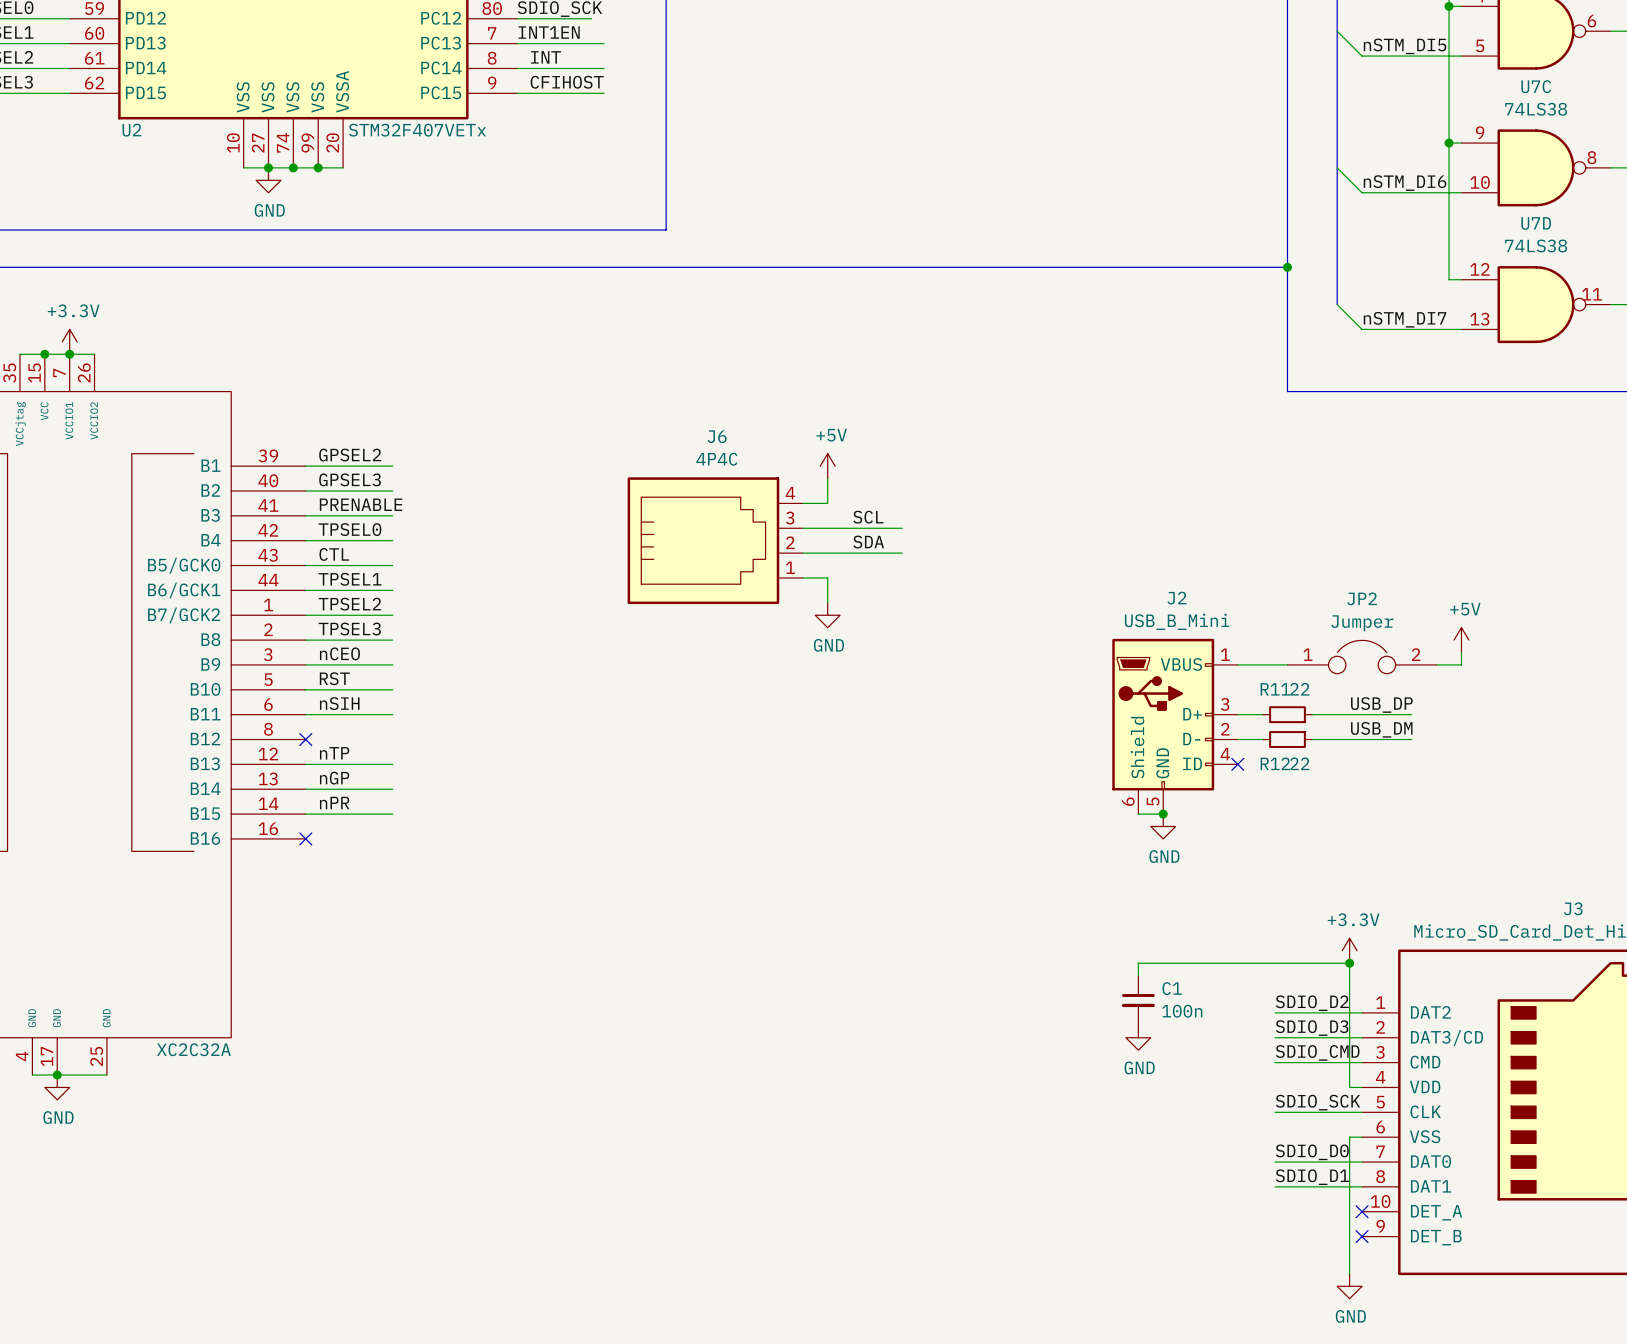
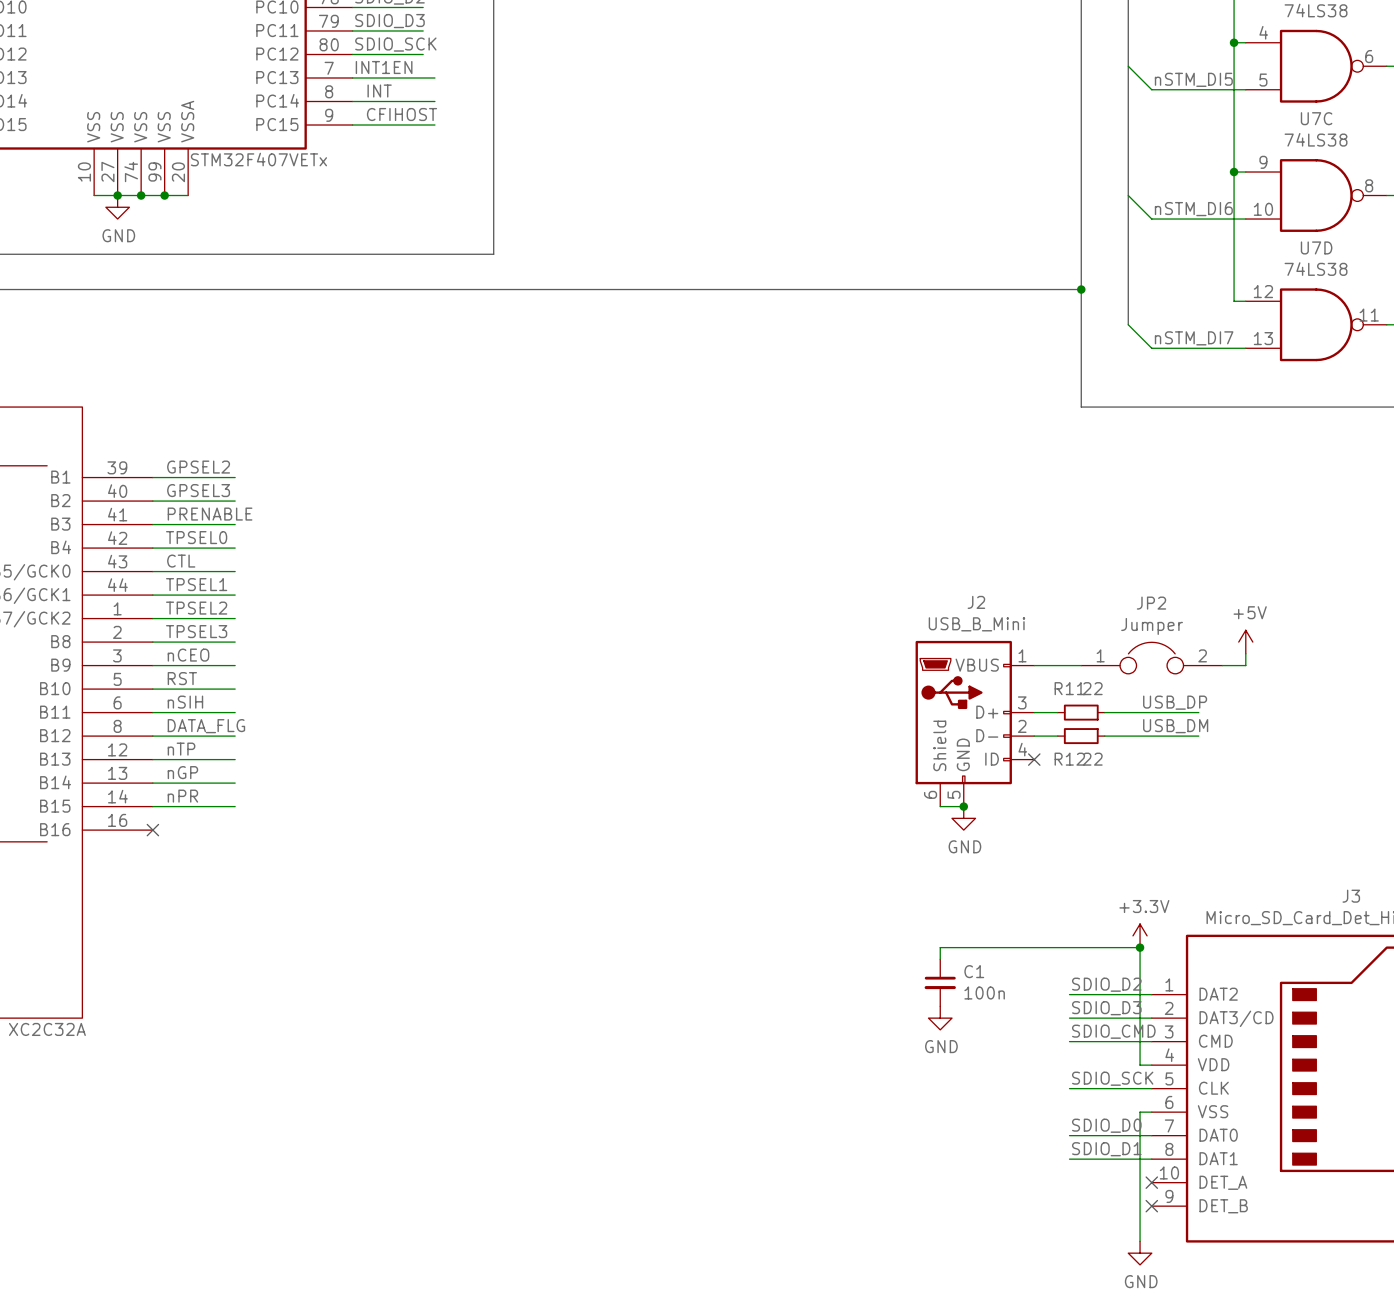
power symbol: +5V (827, 466) -> none
wire: (827, 478) (827, 503) (802, 503) -> none
label: SCL (868, 517) -> none
wire: (802, 528) (902, 528) -> none
J6: 4P4C (715, 540) -> none
label: SDA (868, 542) -> none
wire: (802, 553) (902, 553) -> none
wire: (802, 577) (827, 577) (827, 602) -> none
power symbol: GND (827, 615) -> none
label: none -> DATA_FLG (206, 726)
wire: none -> (152, 736) (235, 736)
no-connect mark: (305, 739) -> none

